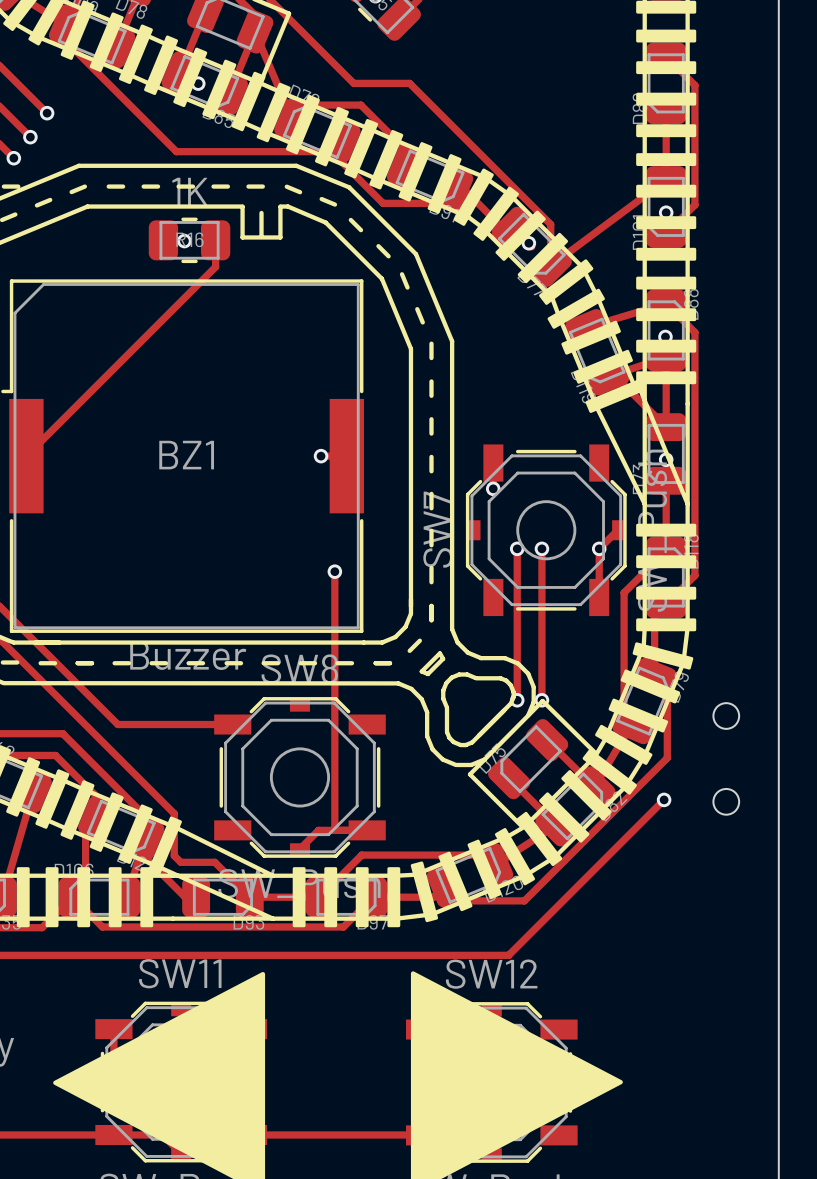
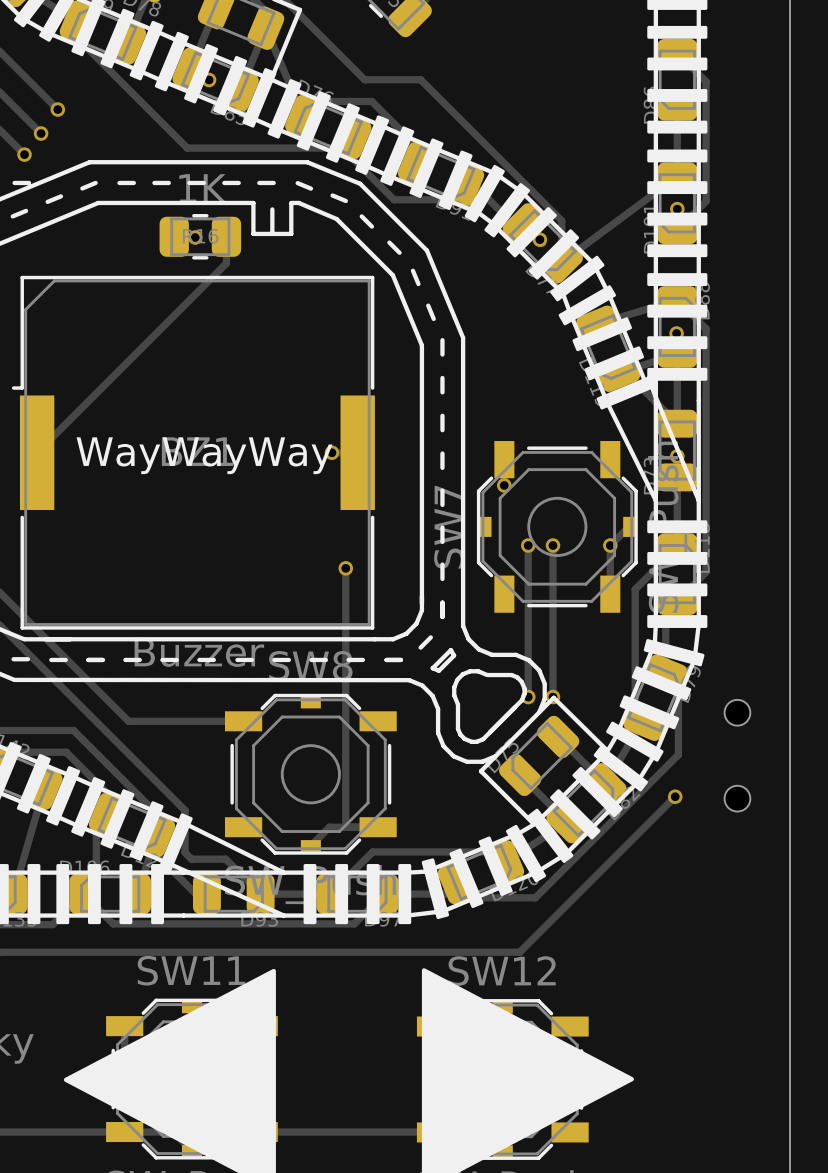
text: none -> WayWayWay (204, 455)

